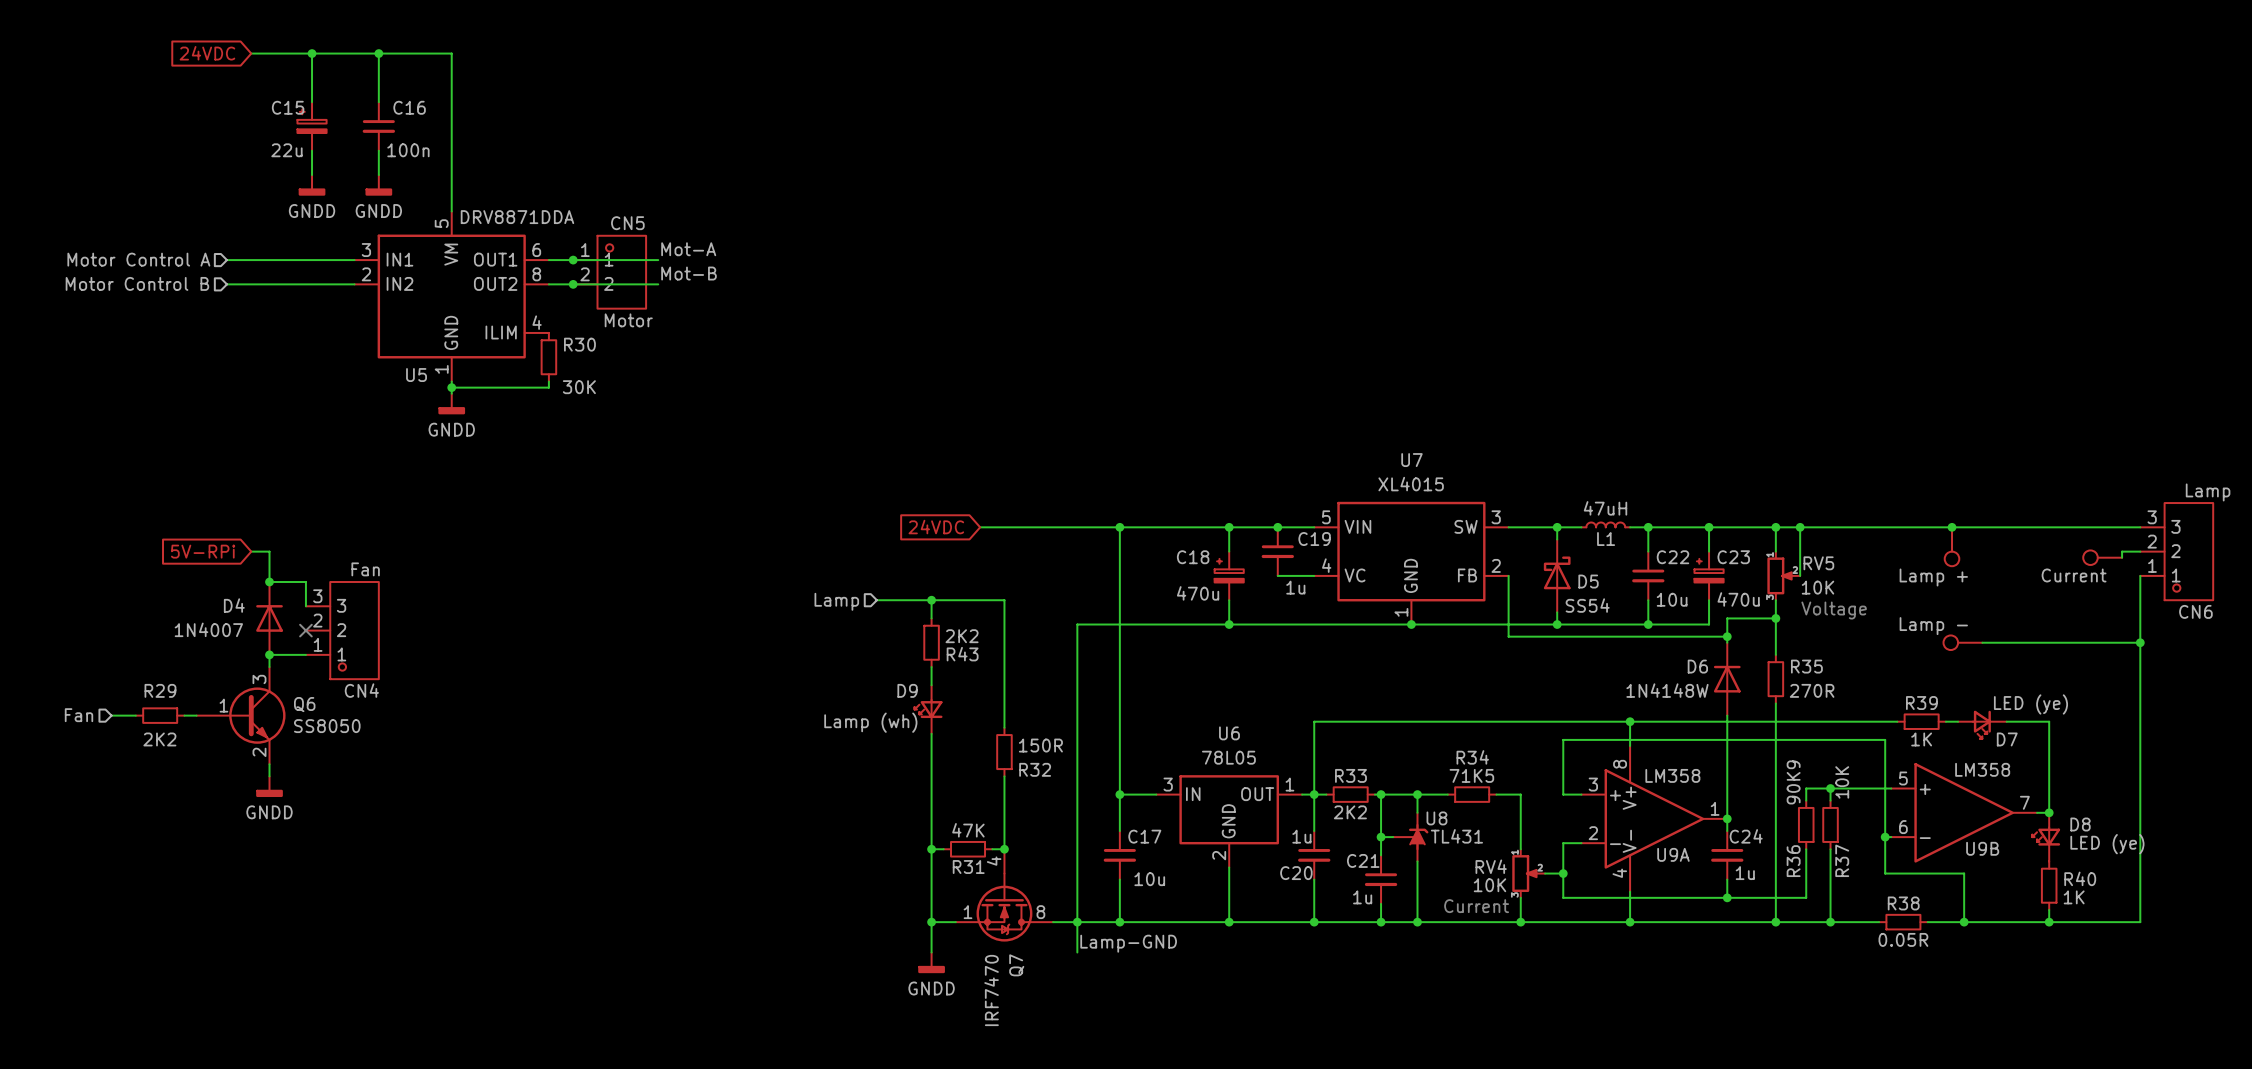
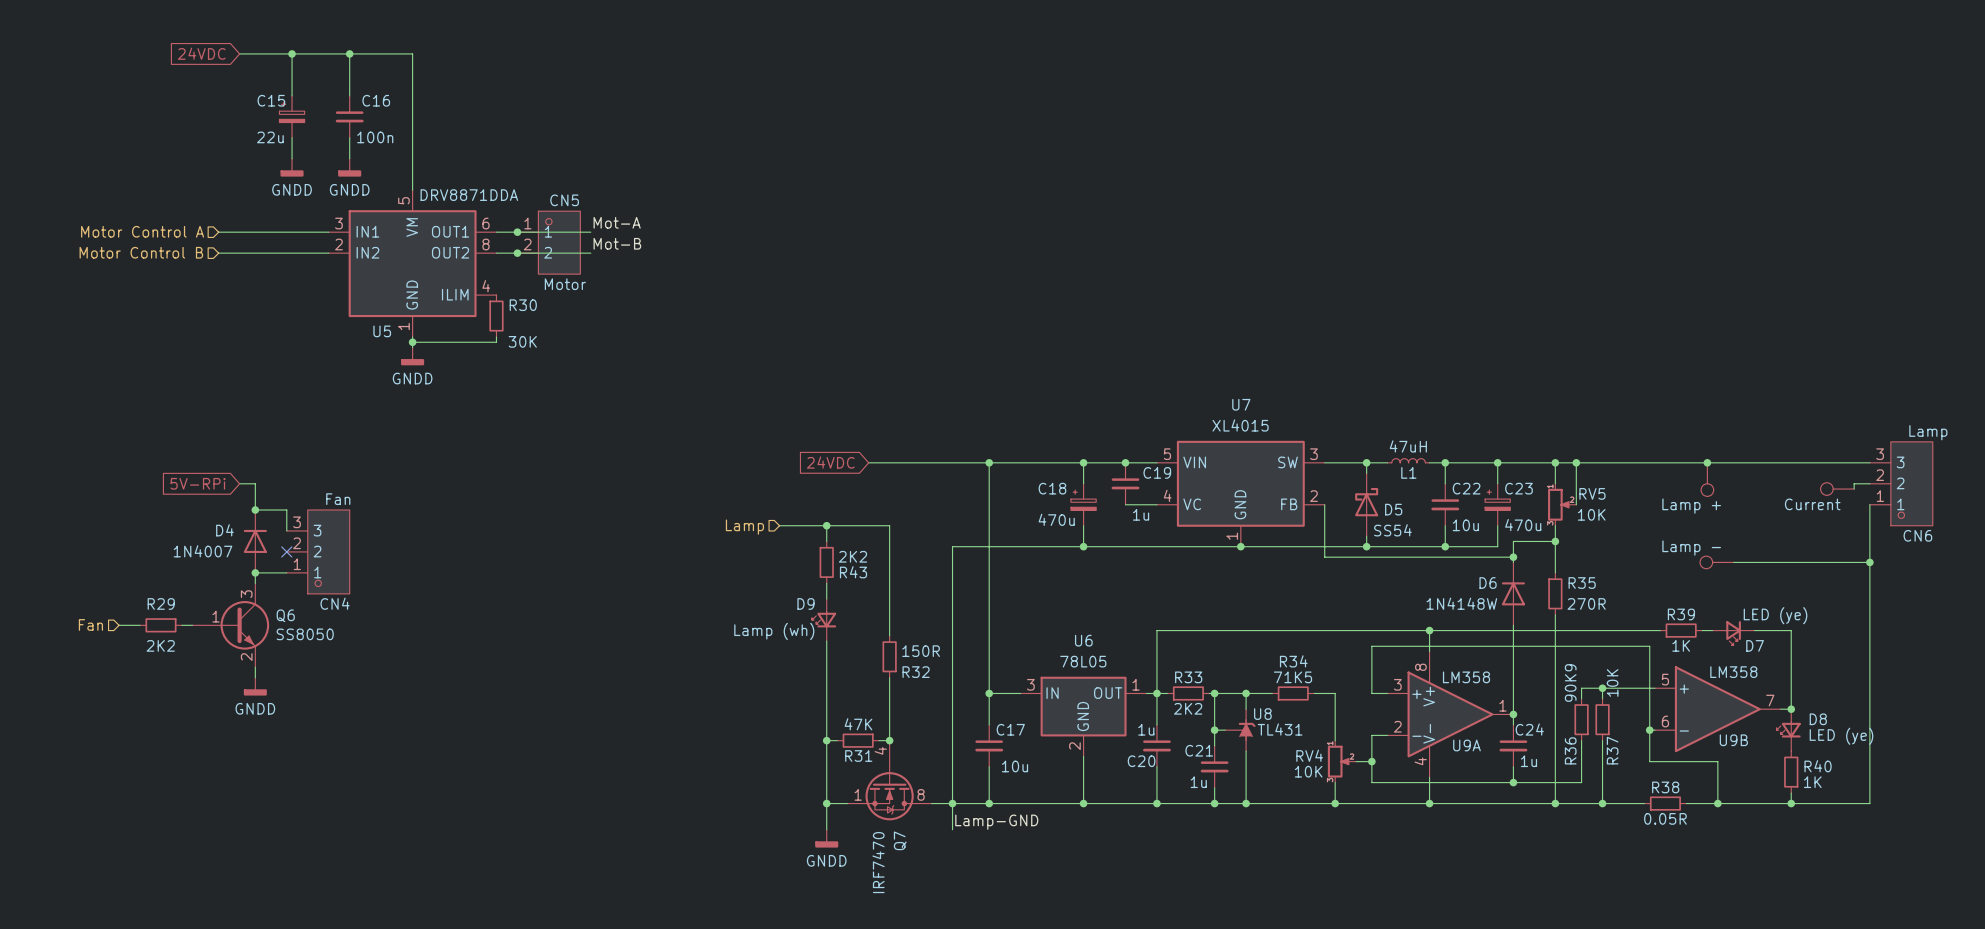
text: Voltage (1834, 610) -> none
text: Current (1476, 906) -> none

